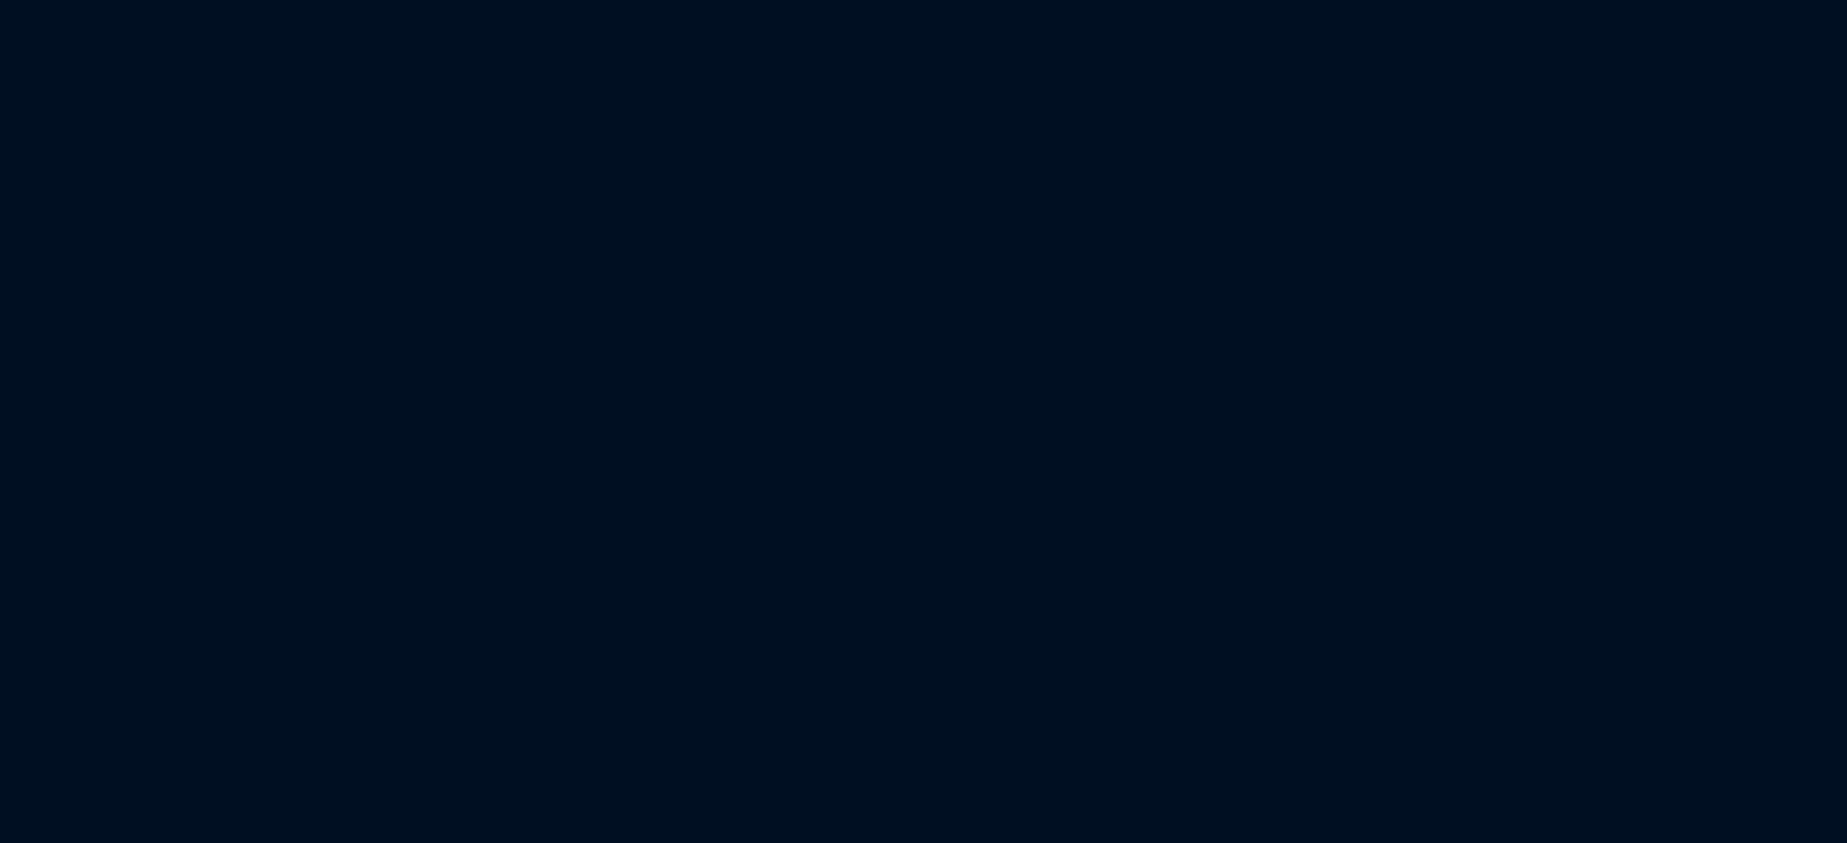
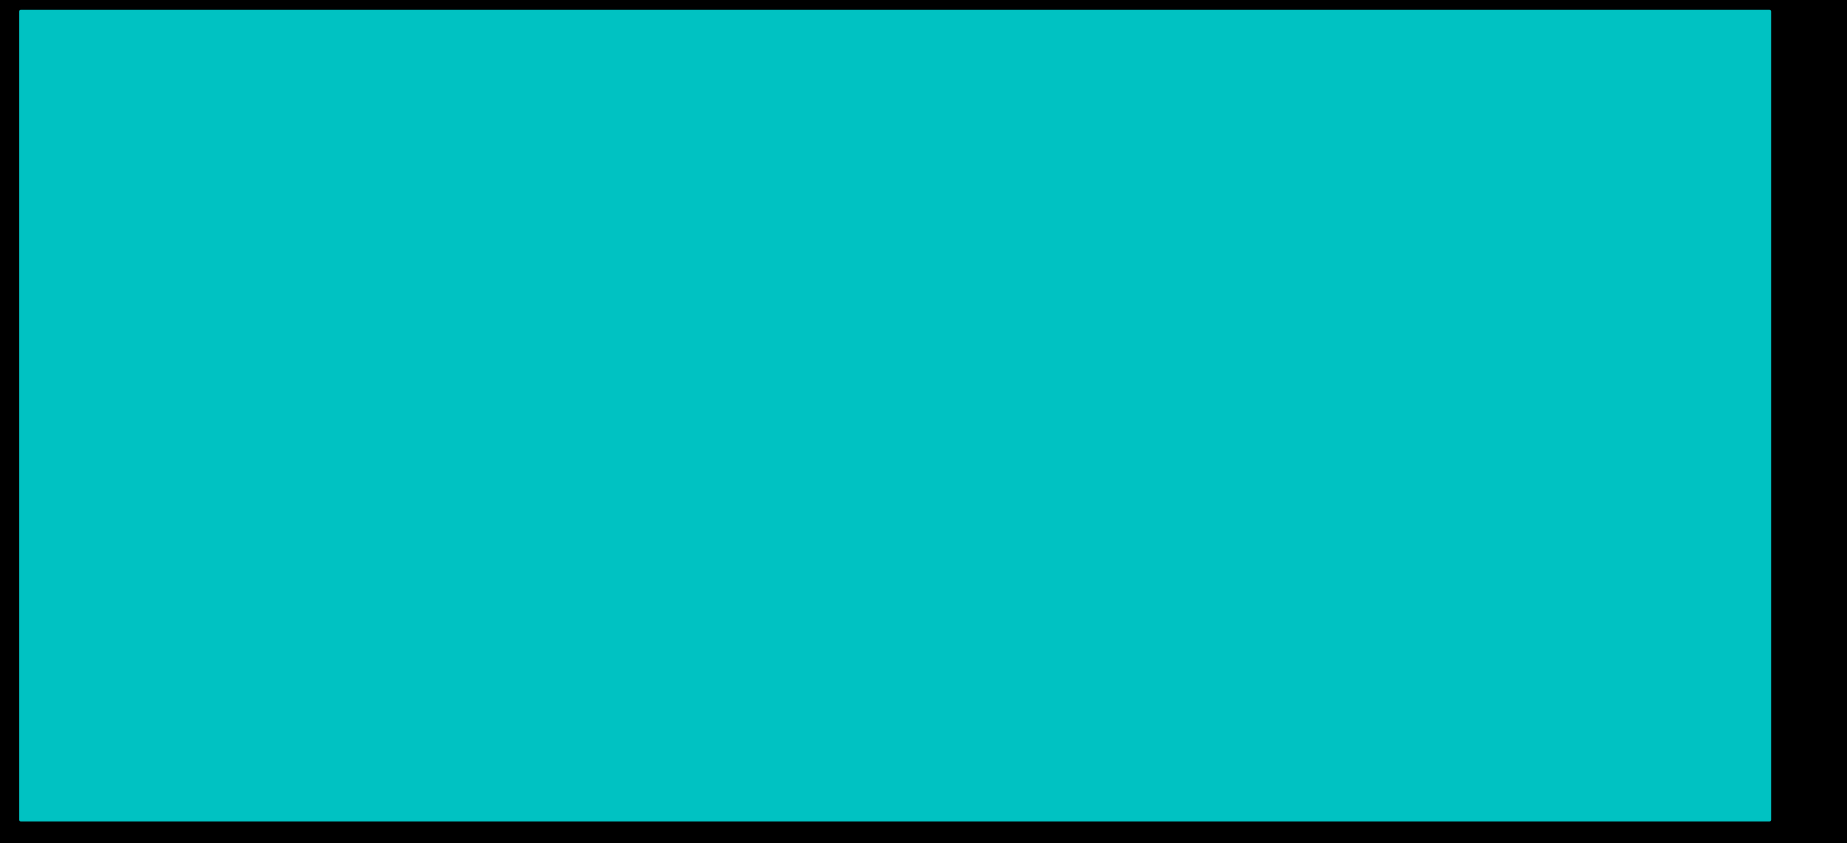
drawing: none -> [19, 9, 1772, 822]

